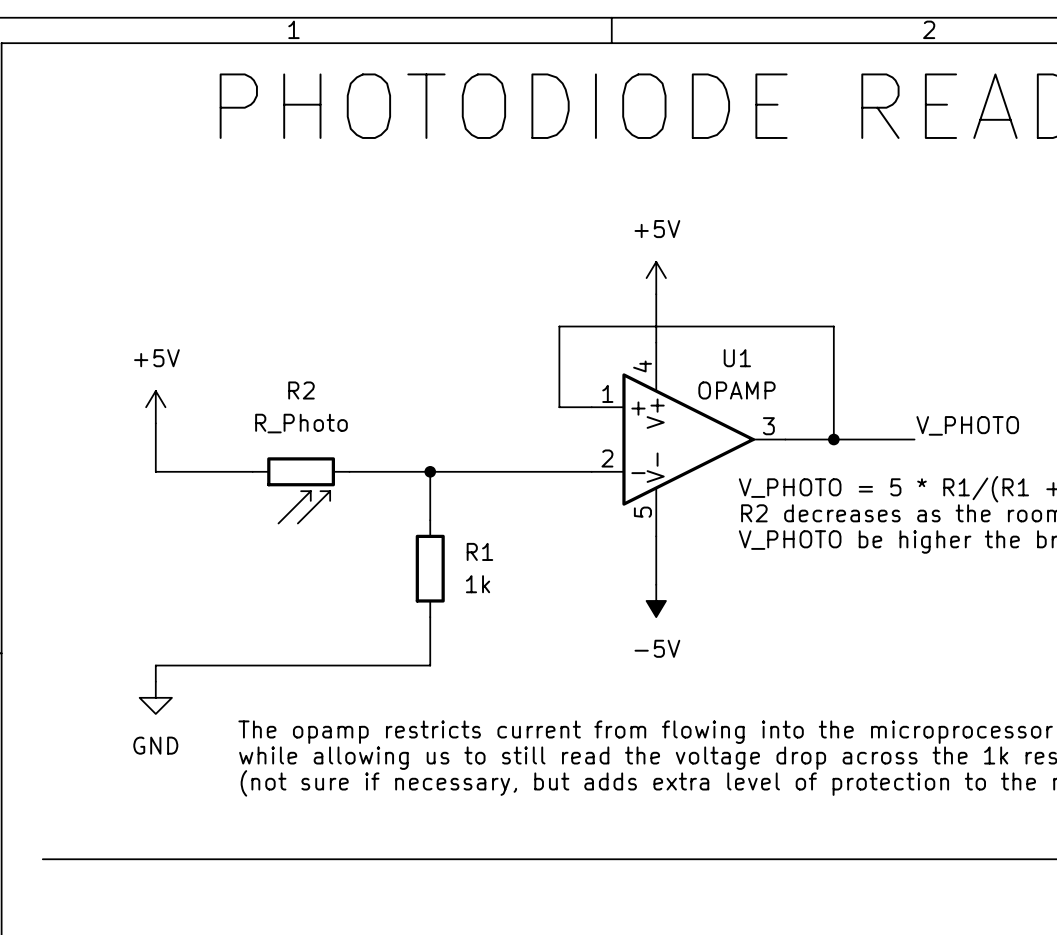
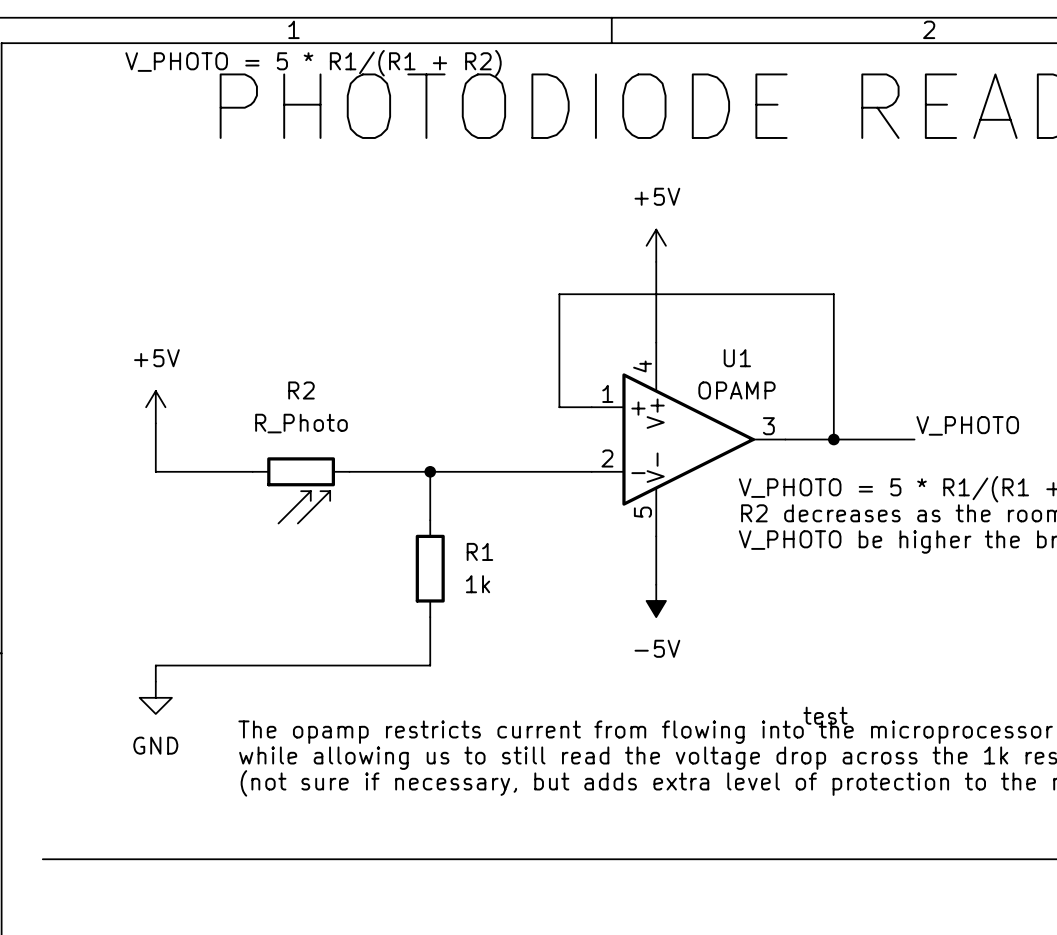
text: none -> V_PHOTO = 5 * R1/(R1 + R2) (313, 63)
power symbol position: +5V (656, 278) -> +5V (656, 245)
wire: (559, 326) (833, 326) -> (559, 326) (559, 294) (833, 294) (833, 326)
label: none -> test (825, 715)

